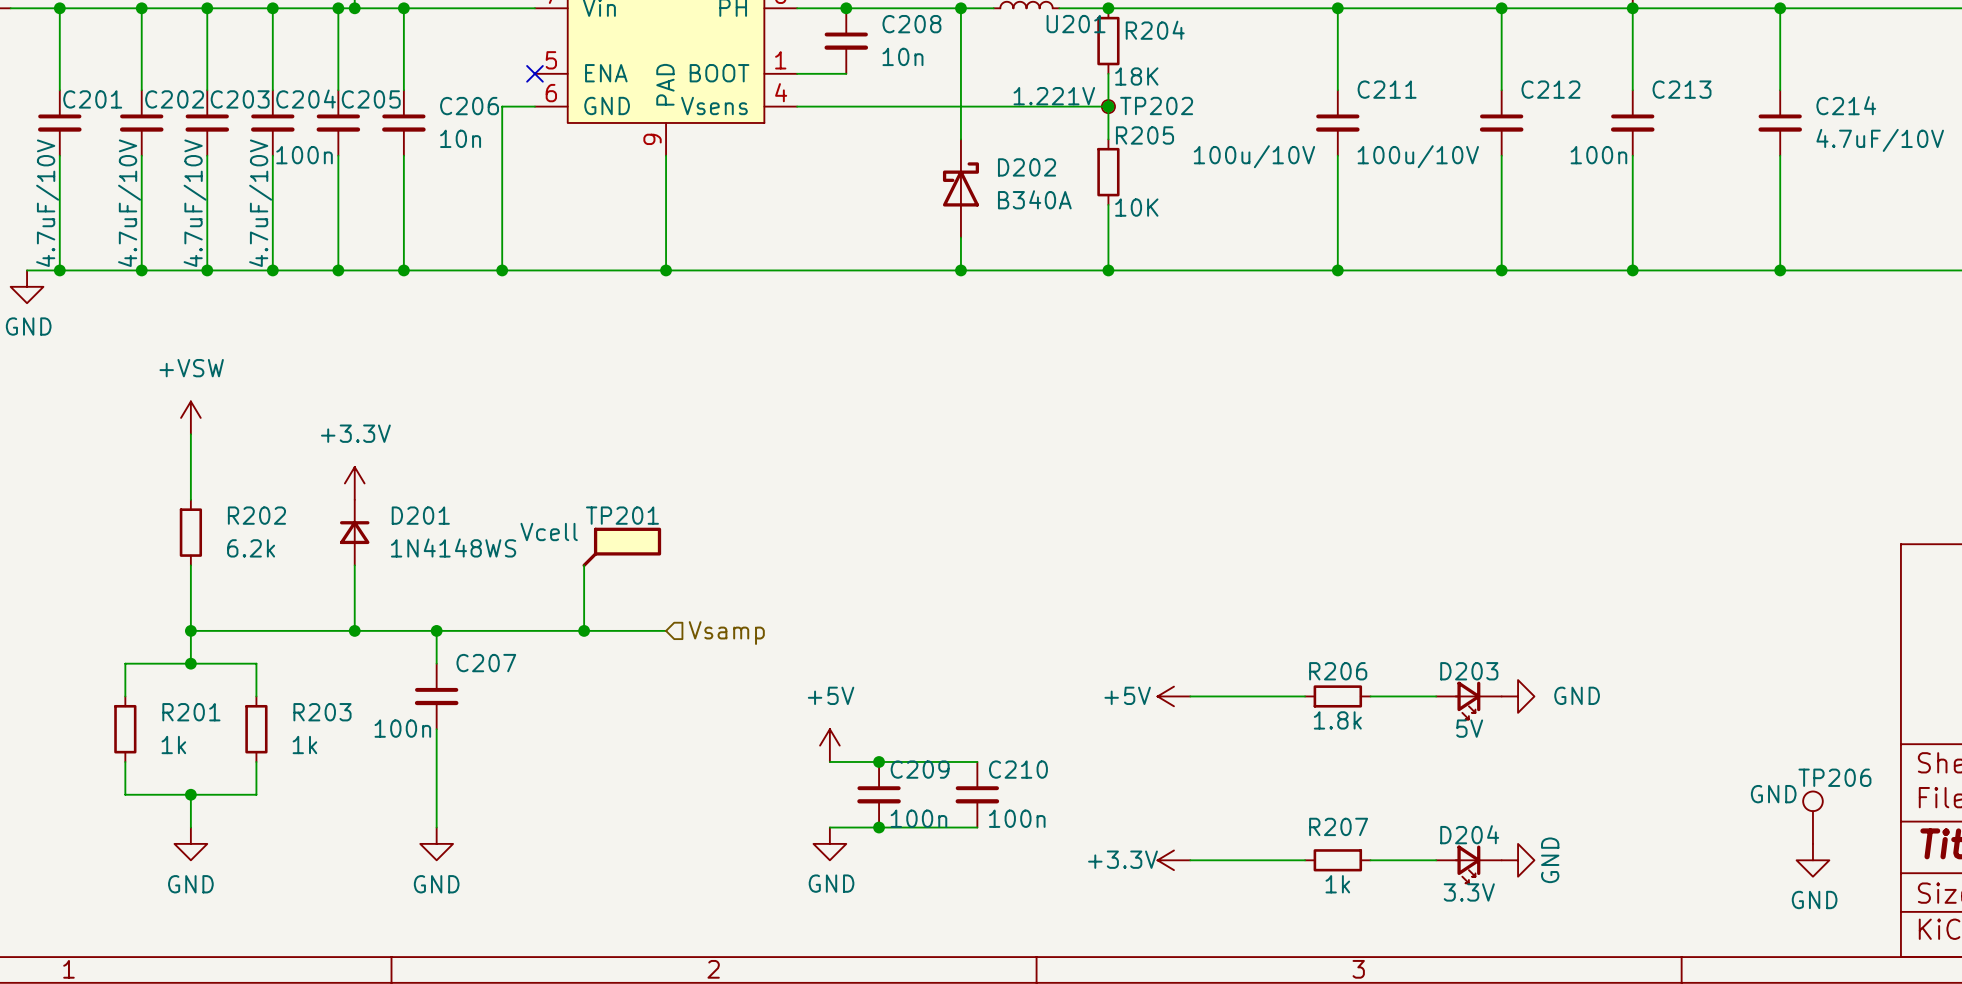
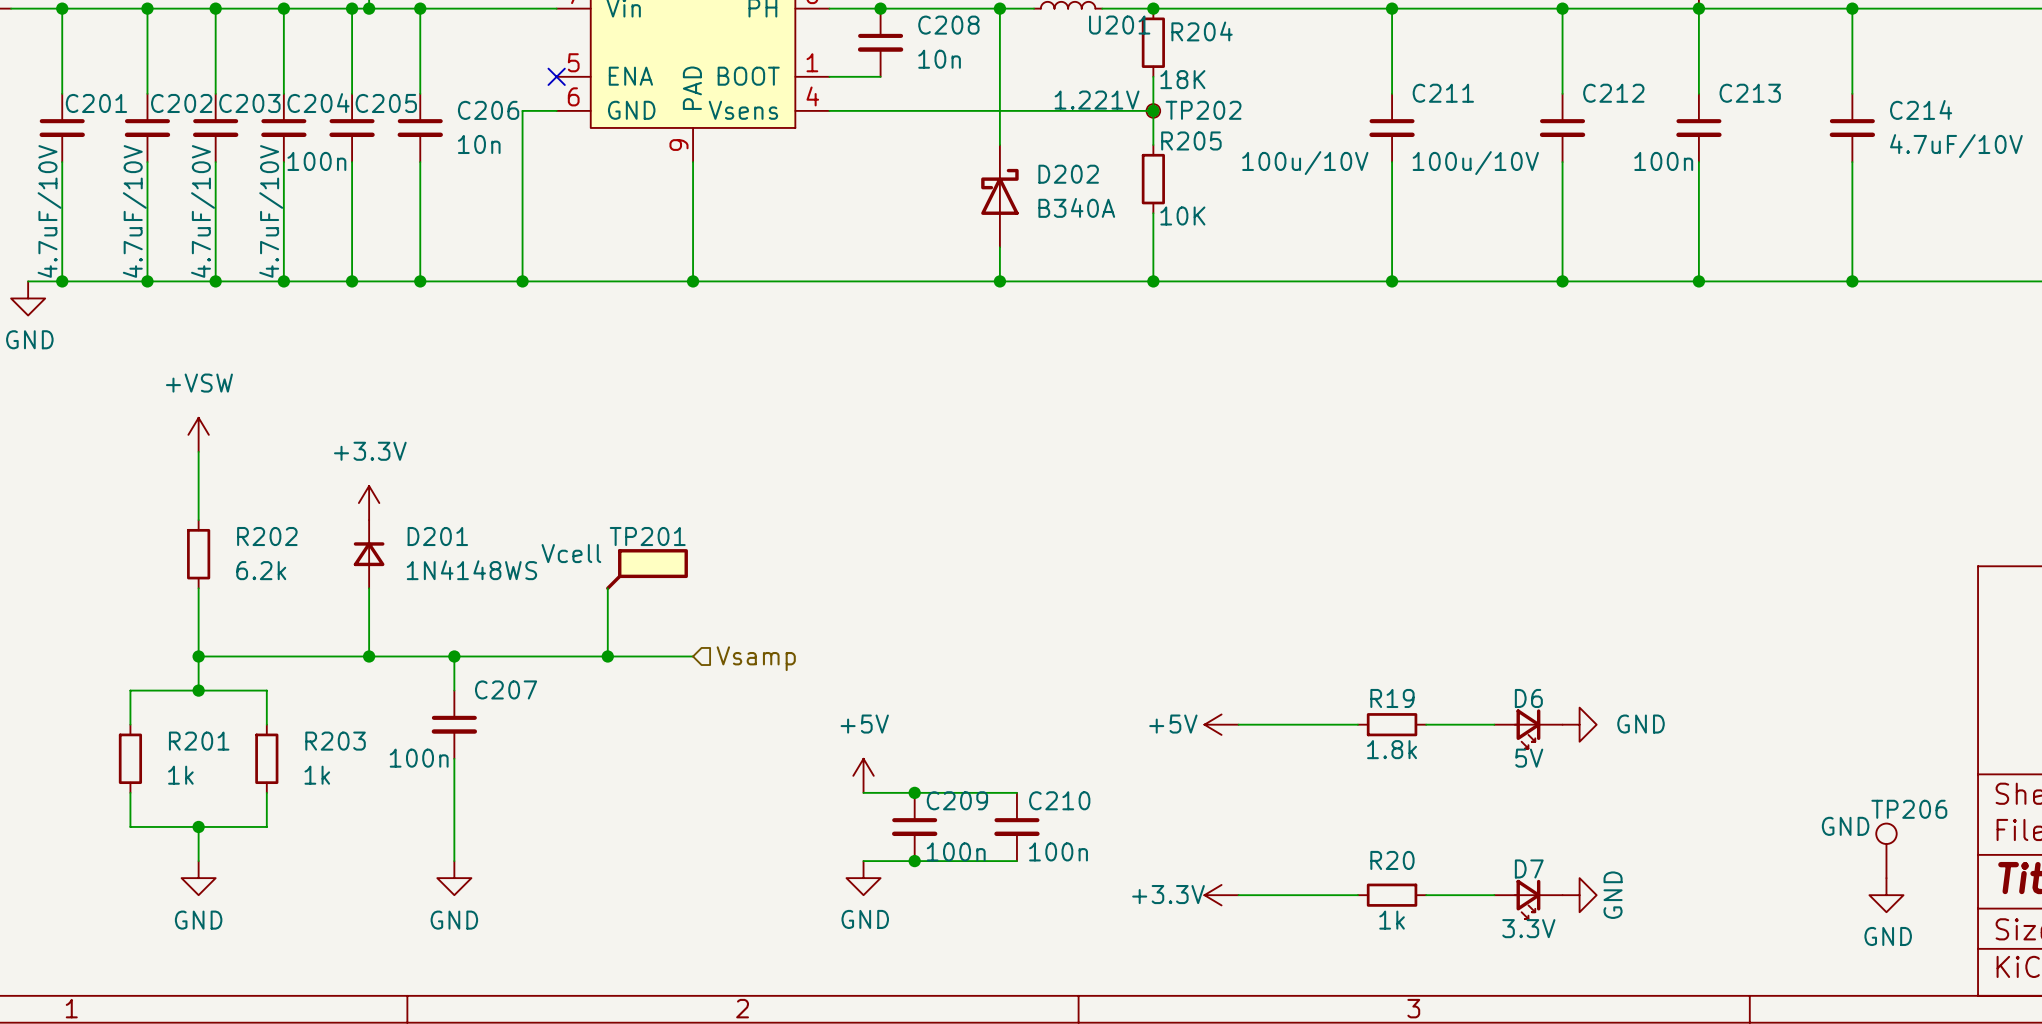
R206 name: R206 (1338, 671) -> R19 (1392, 698)
D203 name: D203 (1469, 671) -> D6 (1528, 698)
R207 name: R207 (1338, 826) -> R20 (1392, 860)
D204 name: D204 (1469, 834) -> D7 (1529, 868)

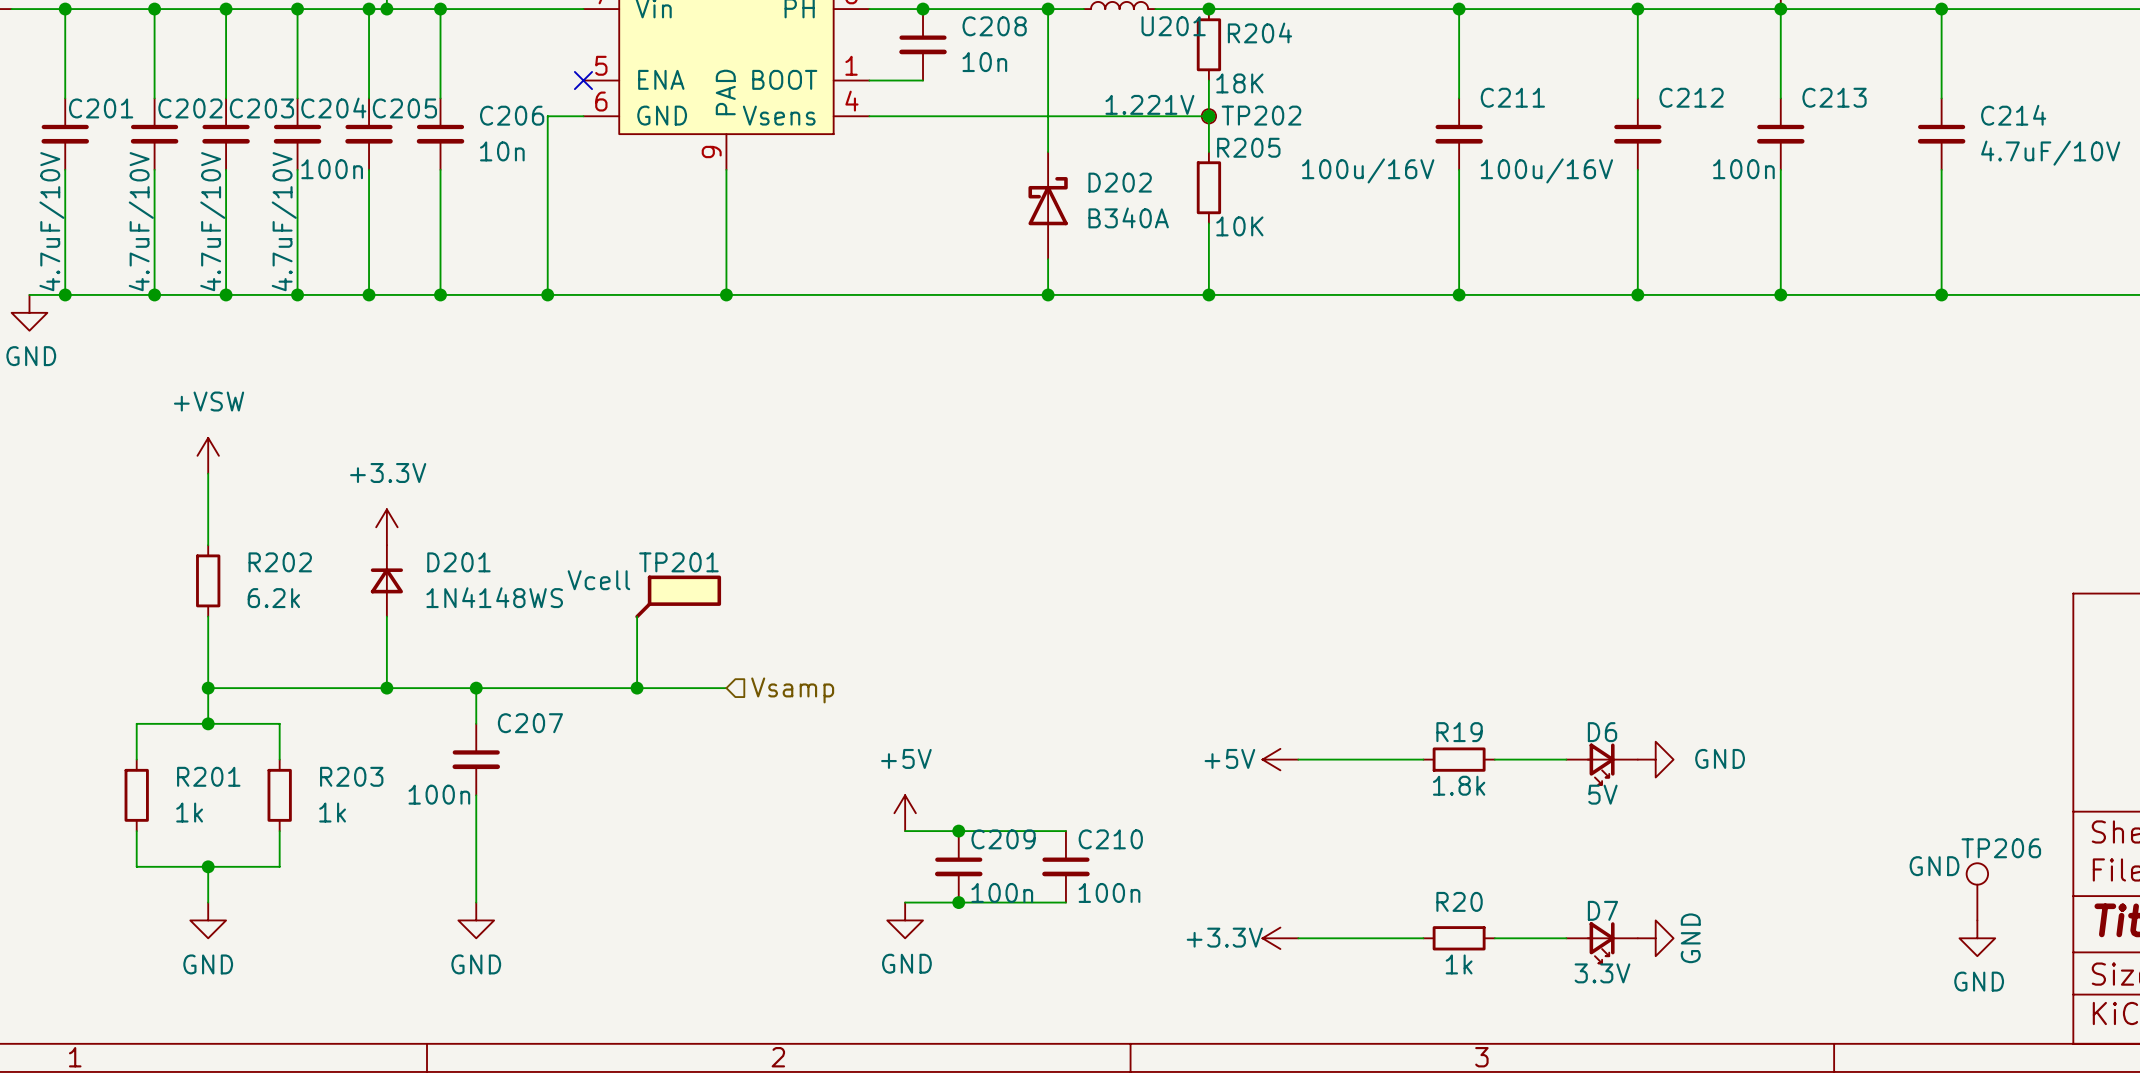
C211 value: 100u/10V (1305, 163) -> 100u/16V (1368, 170)
C212 value: 100u/10V (1475, 163) -> 100u/16V (1546, 170)

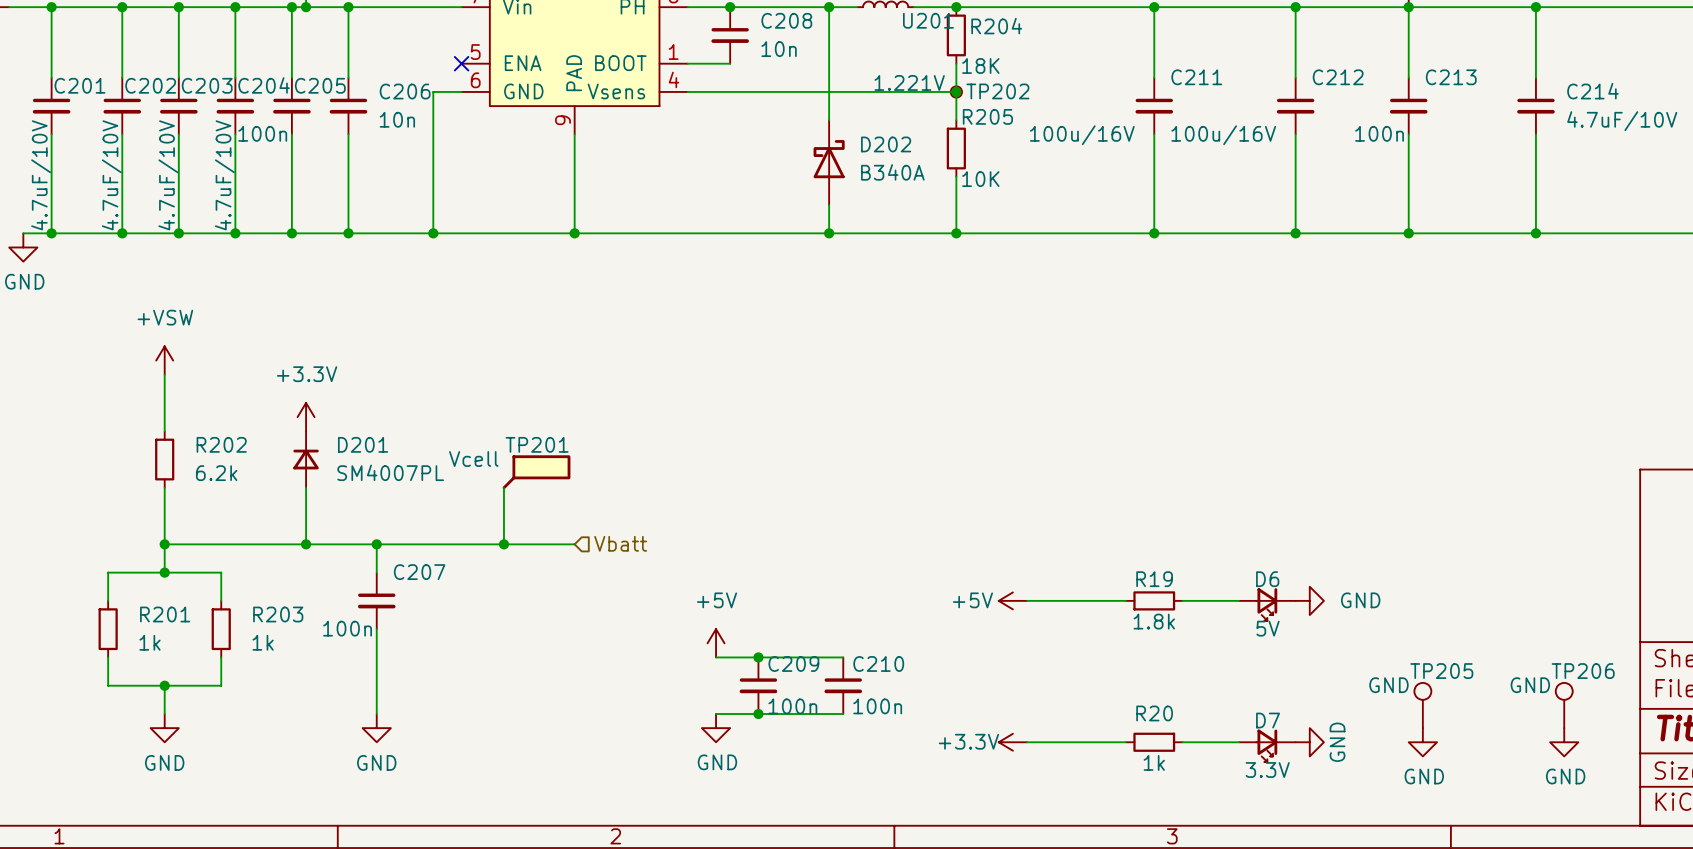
D201 value: 1N4148WS (494, 597) -> SM4007PL (390, 472)
hierarchical label: Vsamp (792, 690) -> Vbatt (620, 543)
TP205: none -> GND (1422, 705)
power symbol: none -> GND (1422, 742)

